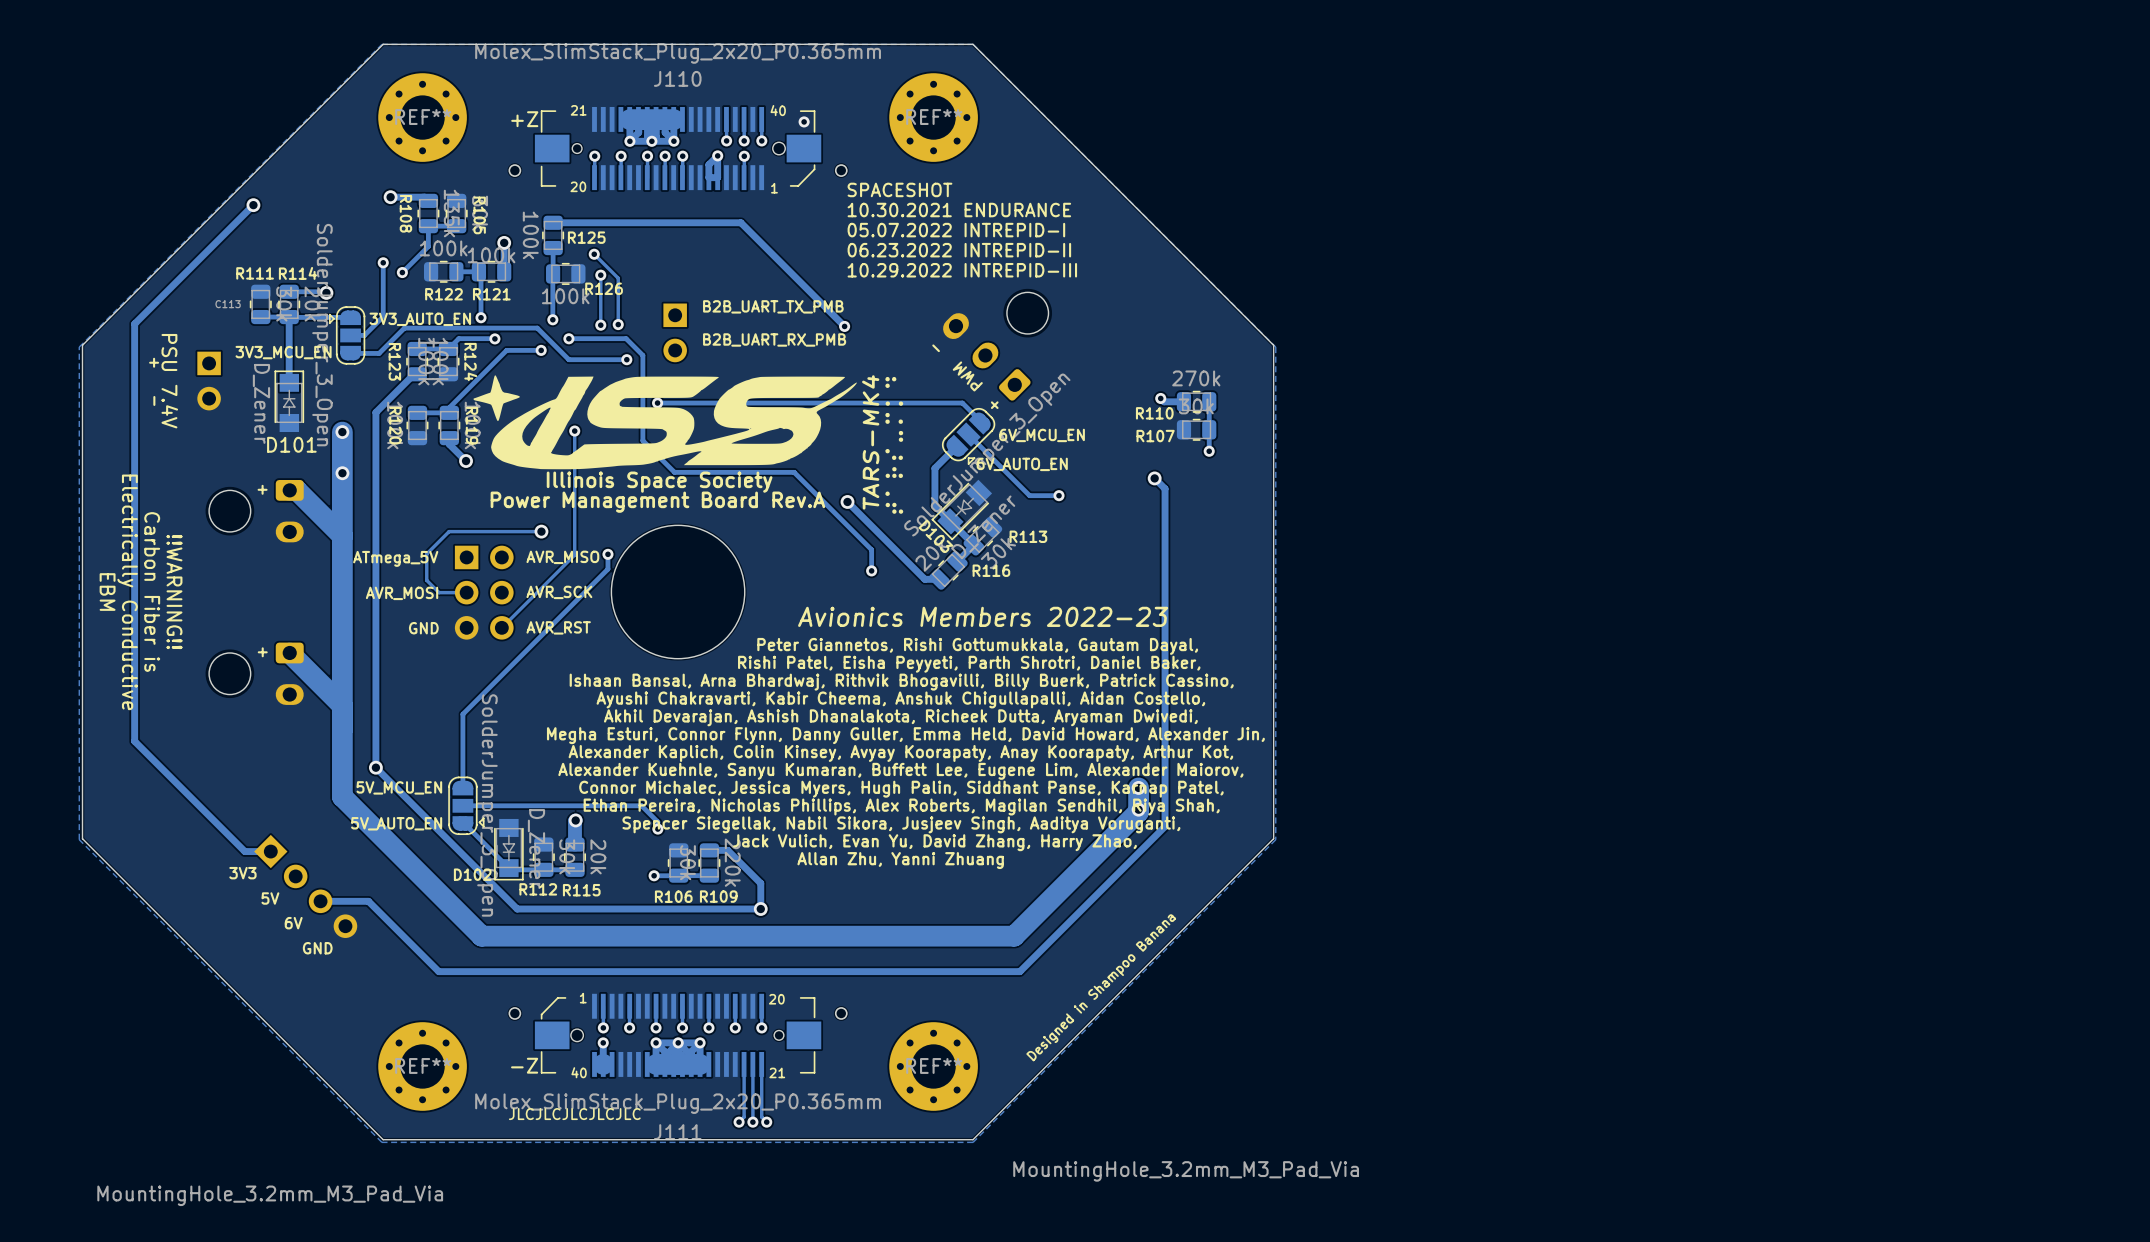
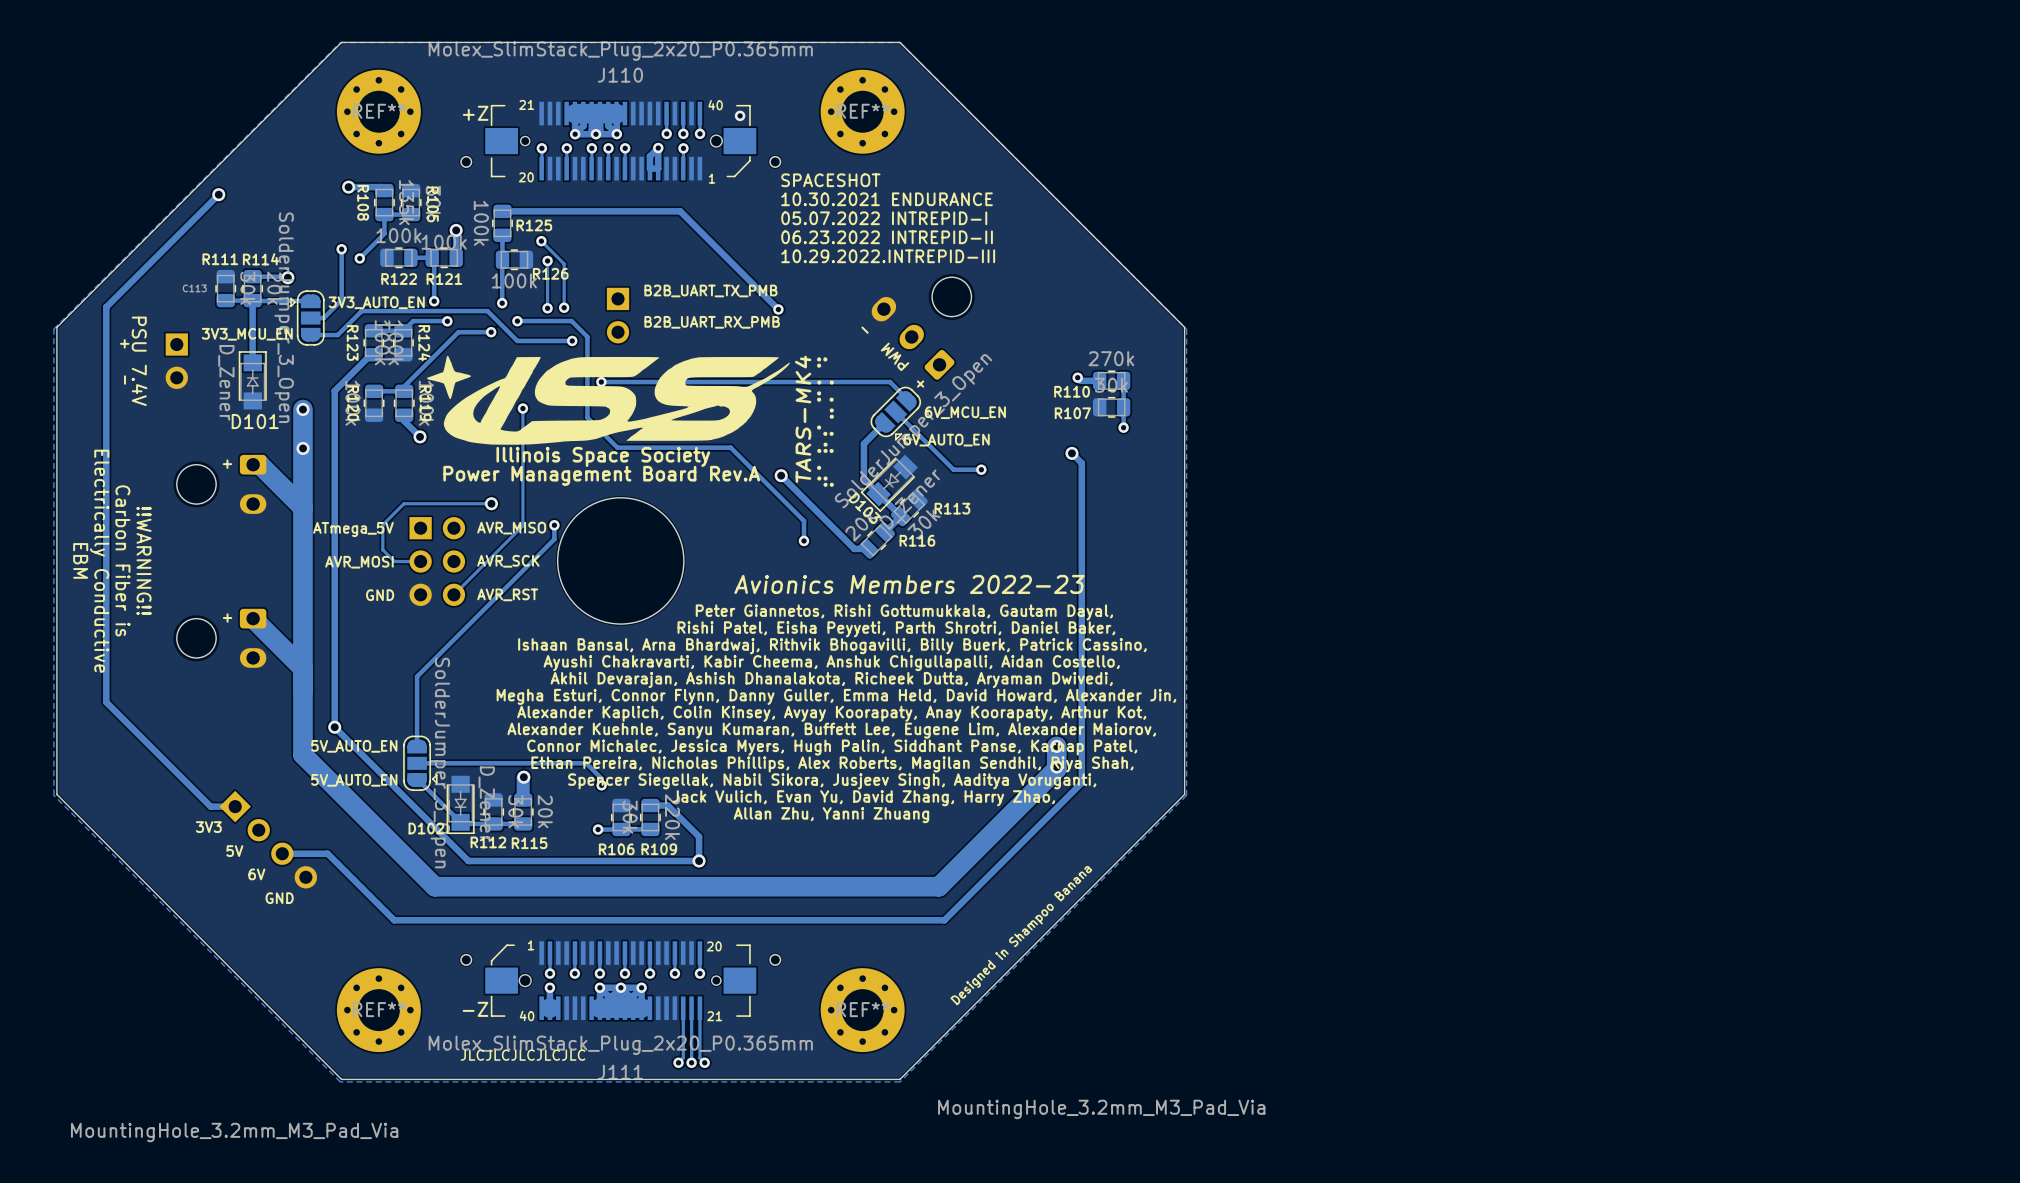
text: 10.29.2022 INTREPID-III (962, 270) -> 10.29.2022.INTREPID-III (888, 256)
text: 5V_MCU_EN (399, 787) -> 5V_AUTO_EN (354, 746)

